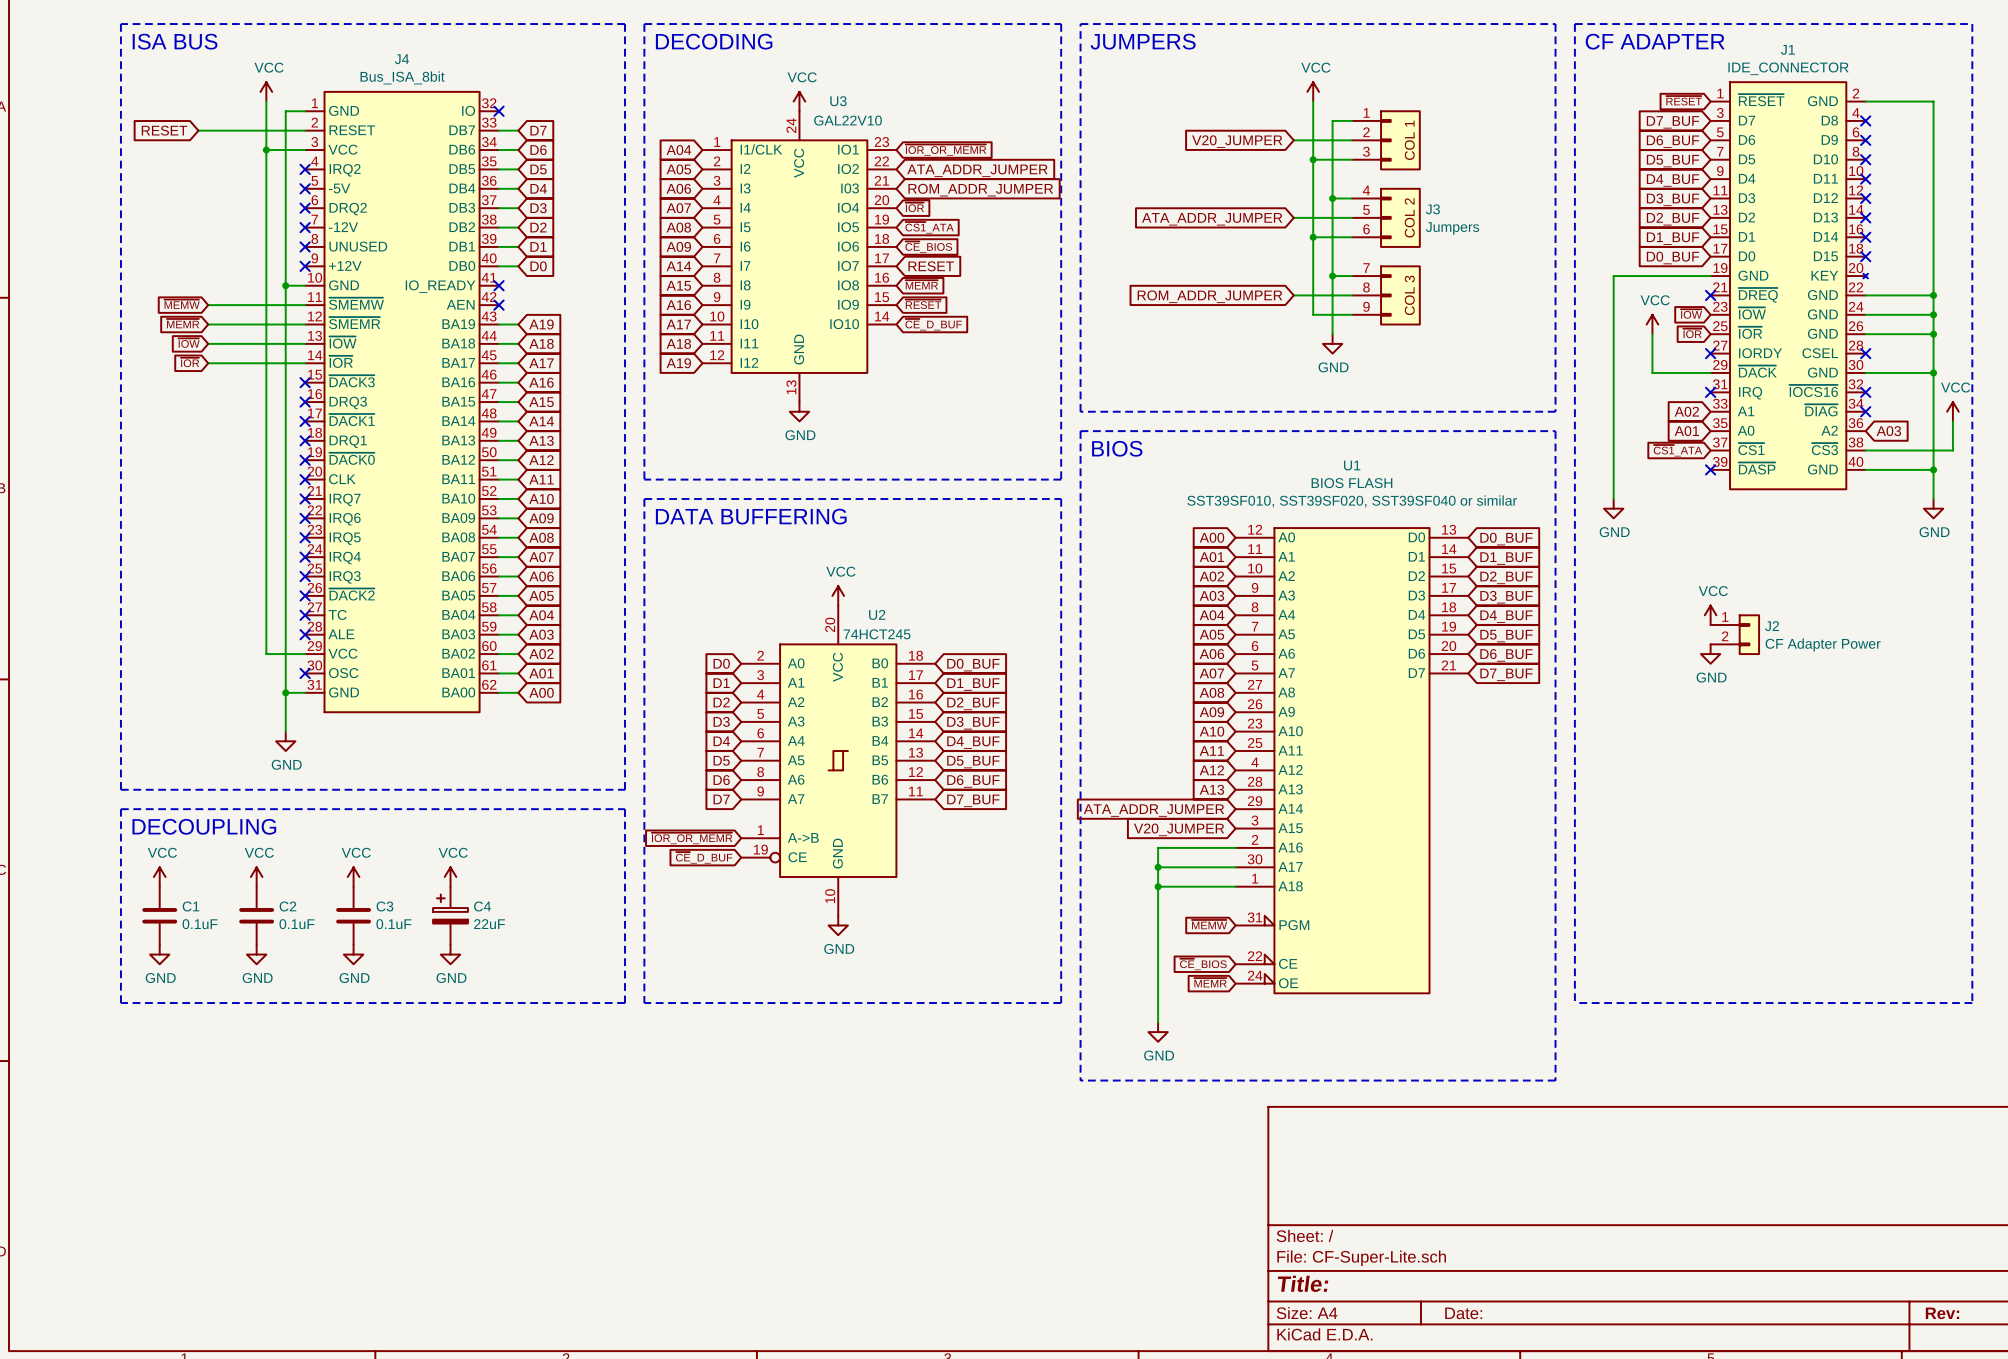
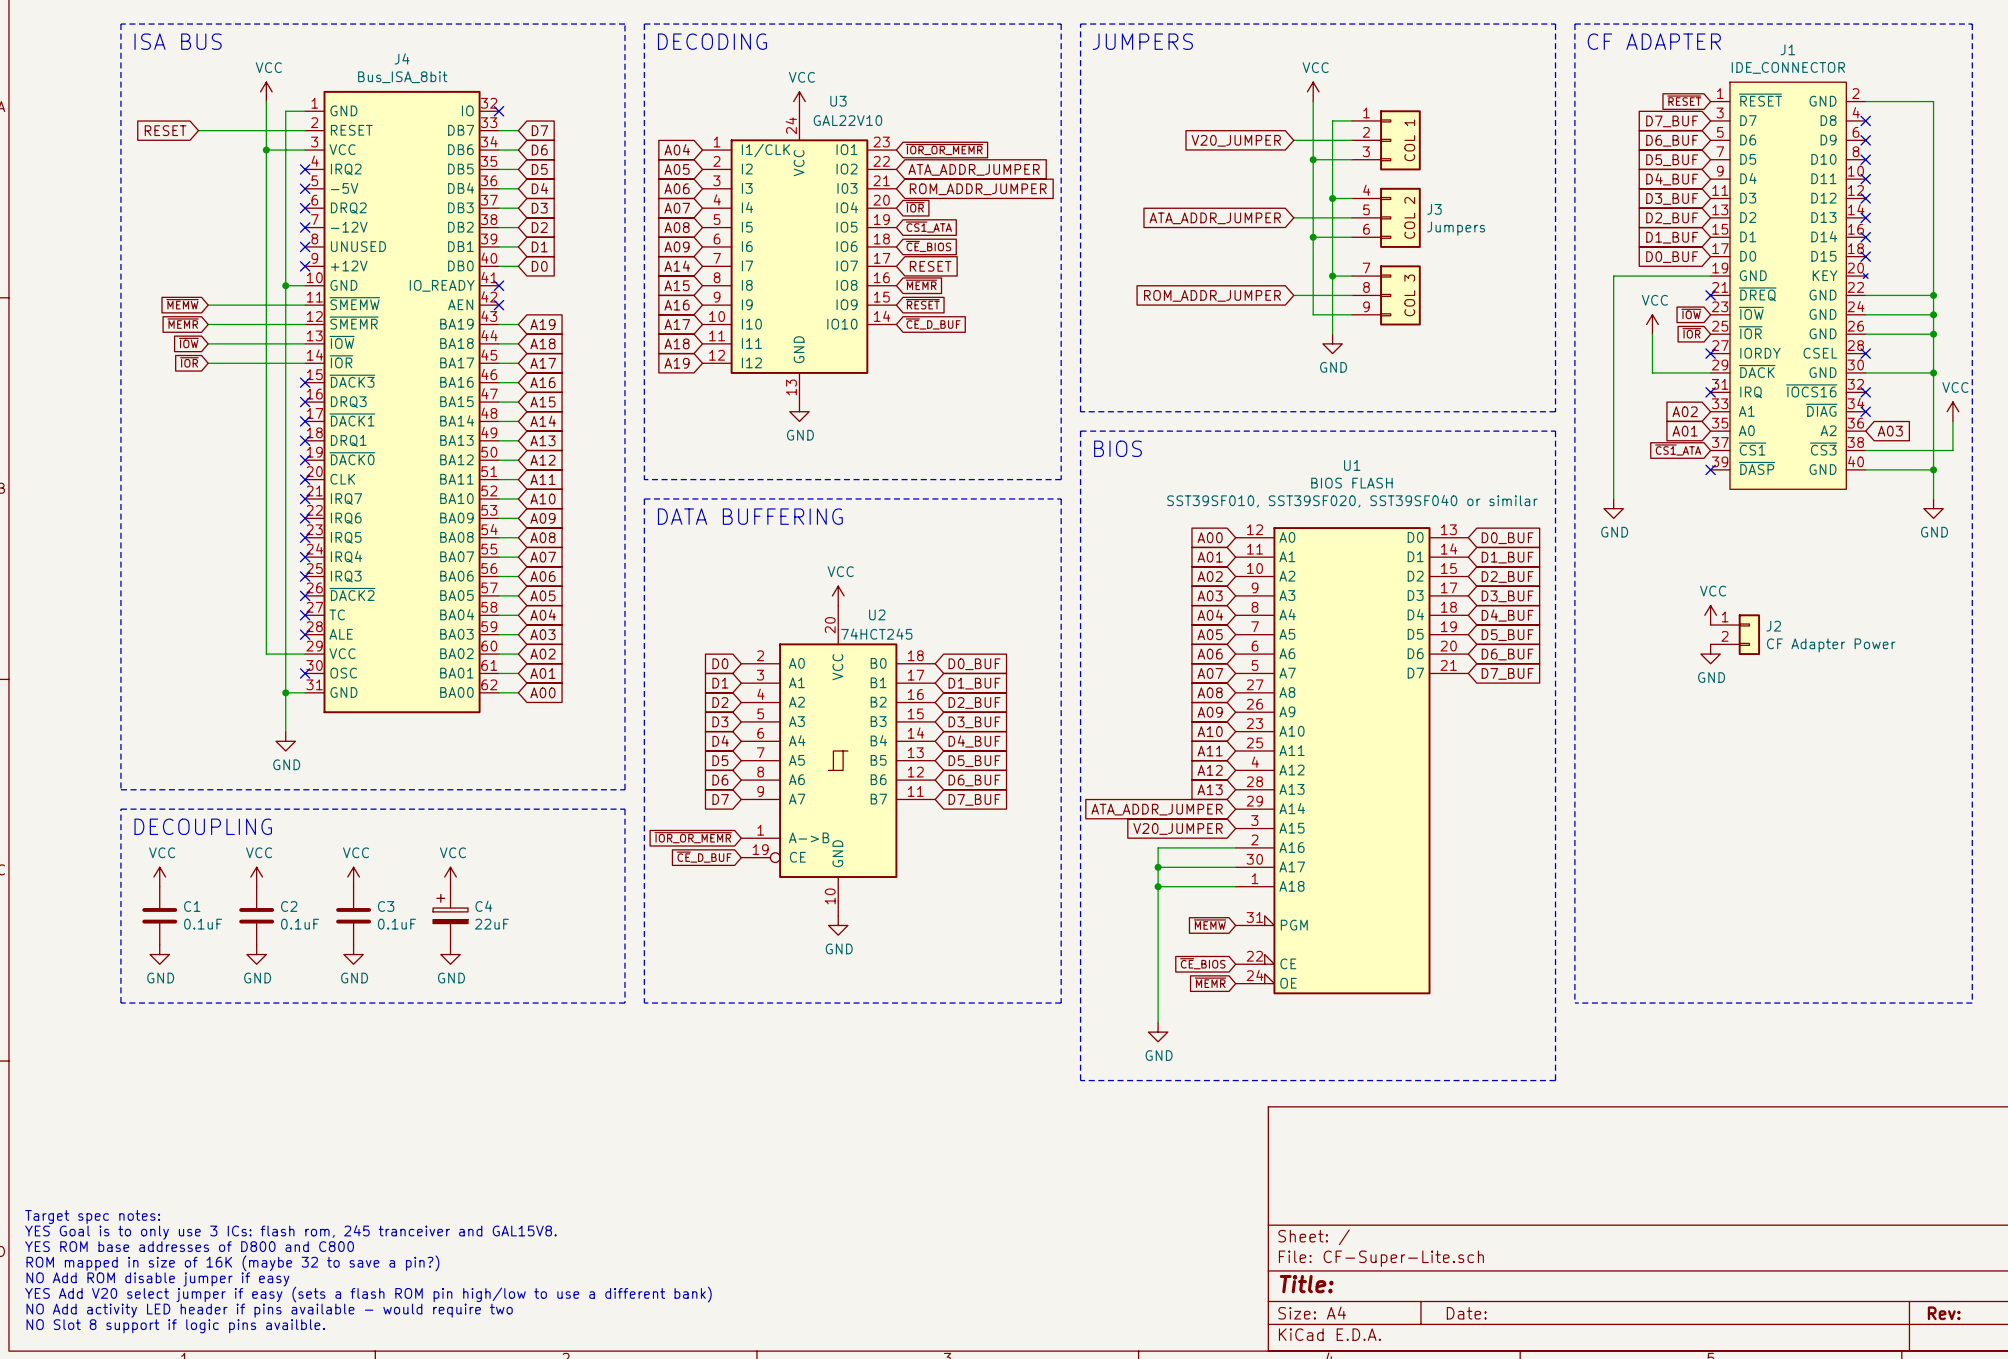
text: none -> Target spec notes: (92, 1217)
text: none -> YES Goal is to only use 3 ICs: flash rom, 245 tranceiver and GAL15V8. (290, 1232)
text: none -> YES ROM base addresses of D800 and C800 (189, 1246)
text: none -> ROM mapped in size of 16K (maybe 32 to save a pin?) (232, 1263)
text: none -> NO Add ROM disable jumper if easy (157, 1279)
text: none -> YES Add V20 select jumper if easy (sets a flash ROM pin high/low to use a different bank) (368, 1294)
text: none -> NO Add activity LED header if pins available - would require two (269, 1310)
text: none -> NO Slot 8 support if logic pins availble. (175, 1326)

